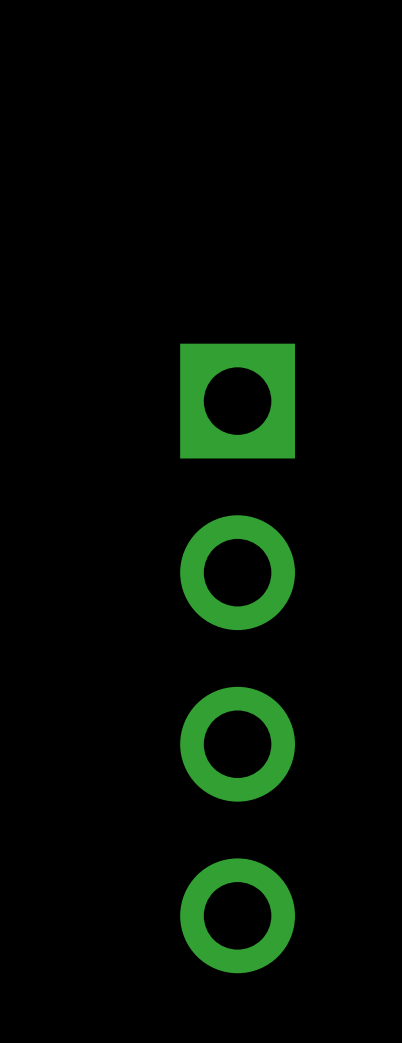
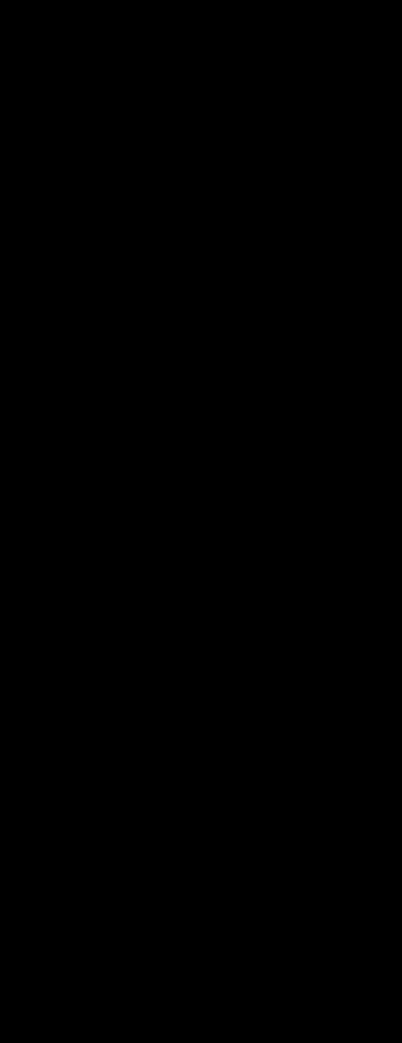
part: (237, 658) -> none

